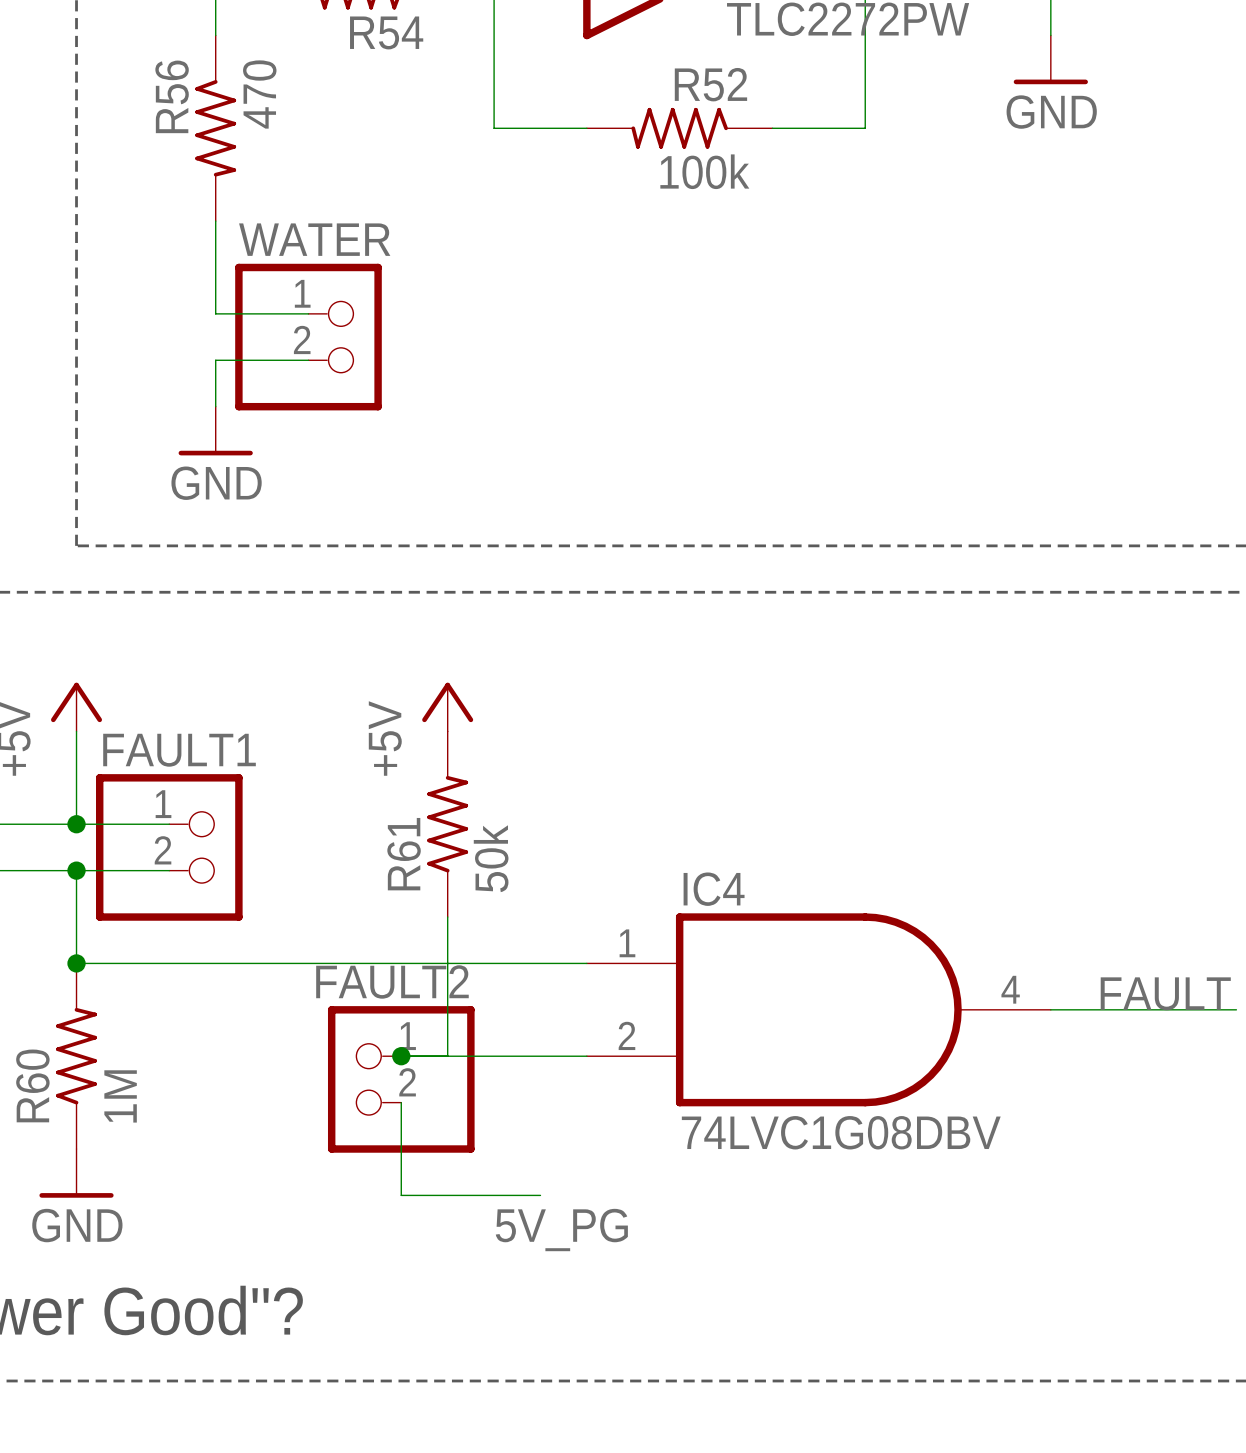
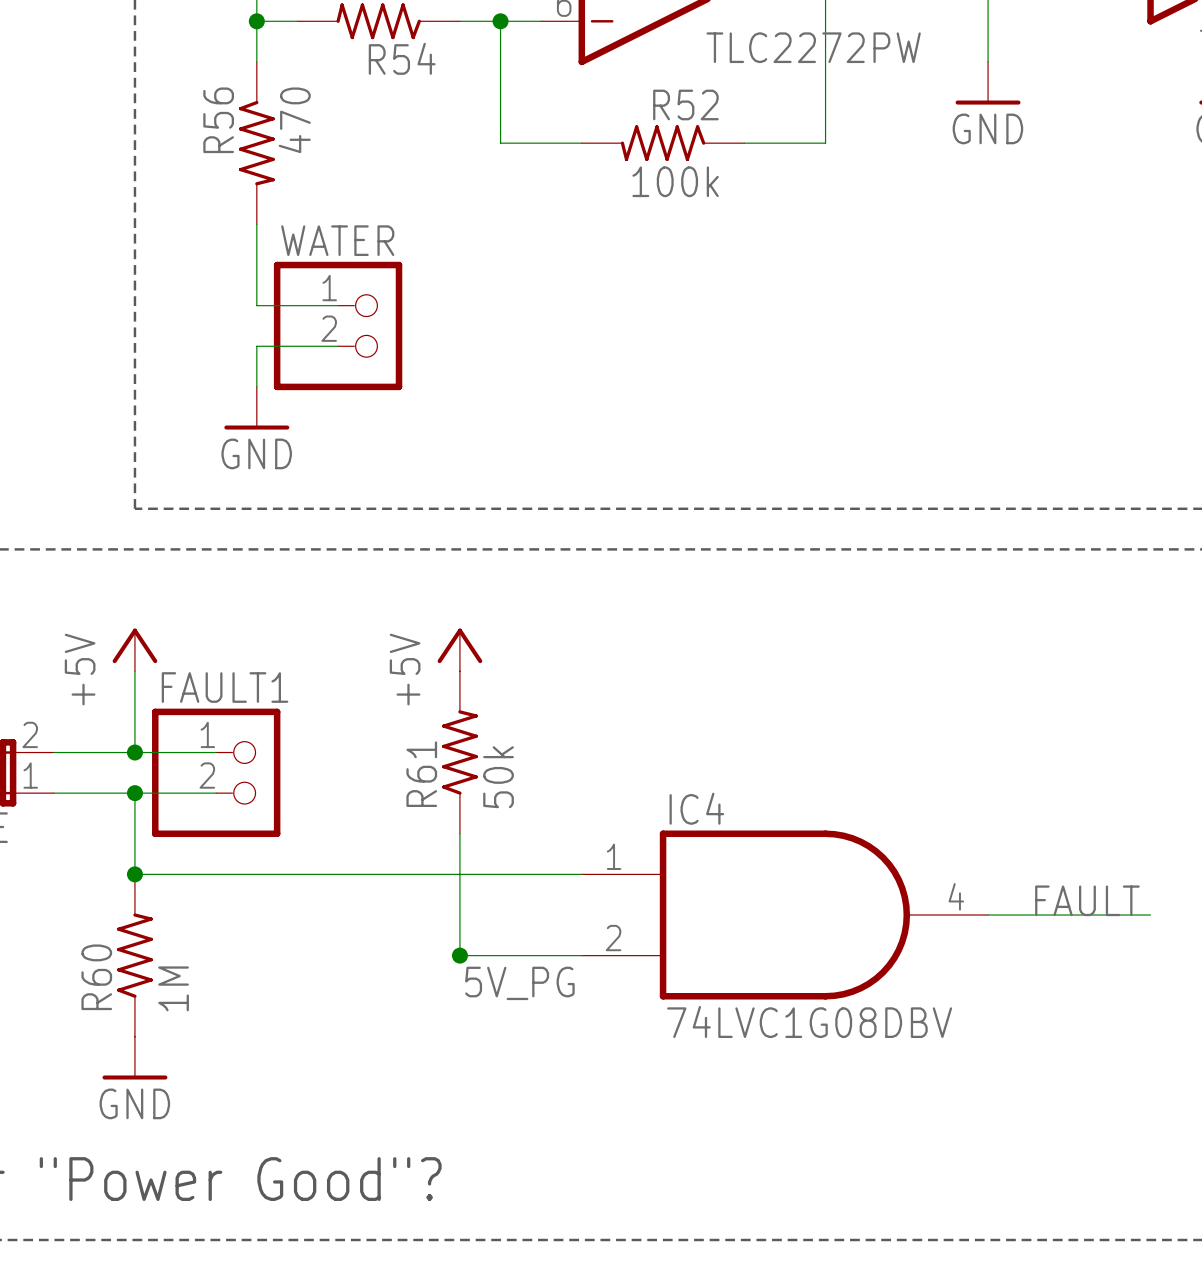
wire: (401, 1056) (447, 1056) -> none
junction position: (401, 1056) -> (459, 955)
FAULT2: (401, 1079) -> none
wire: (401, 1102) (401, 1195) (540, 1195) -> none
label position: 5V_PG (561, 1230) -> 5V_PG (519, 983)

